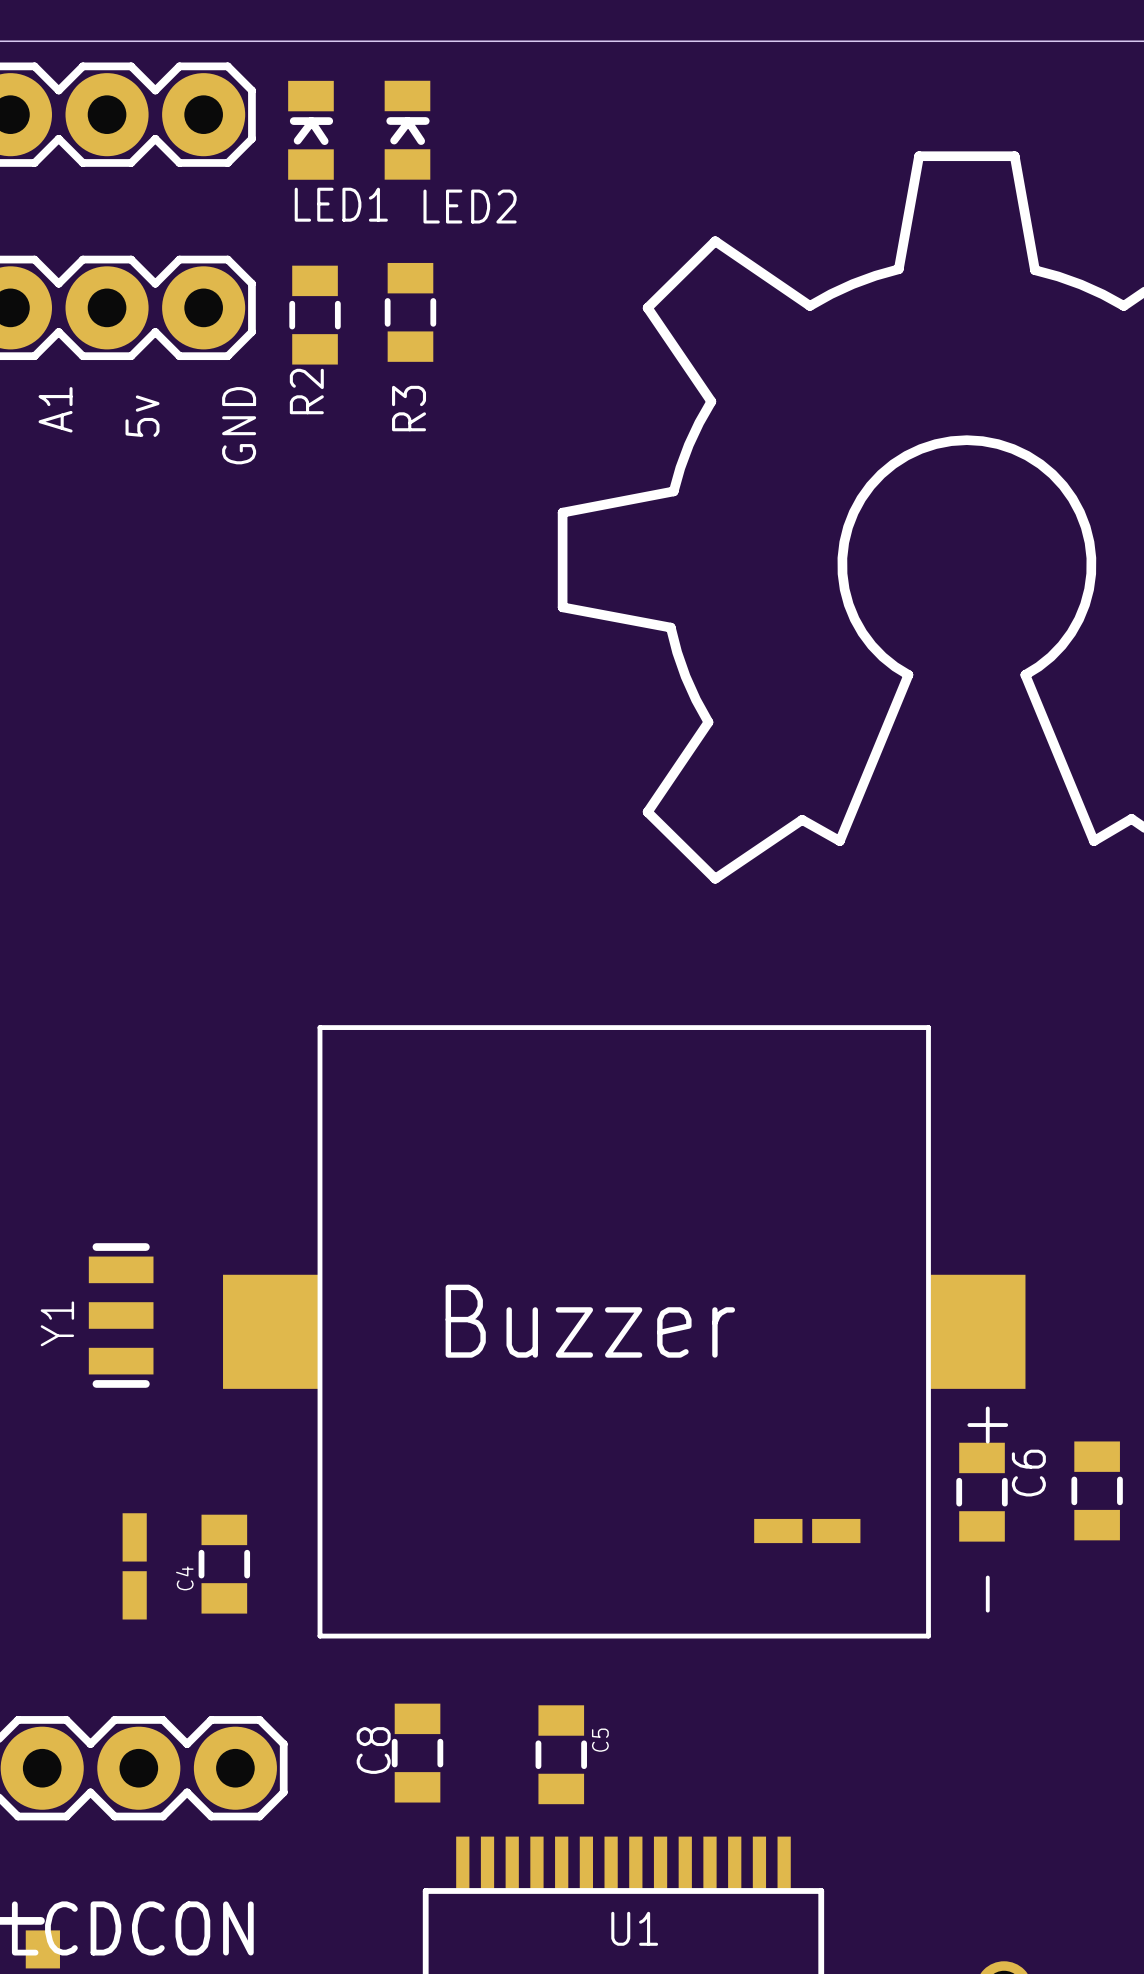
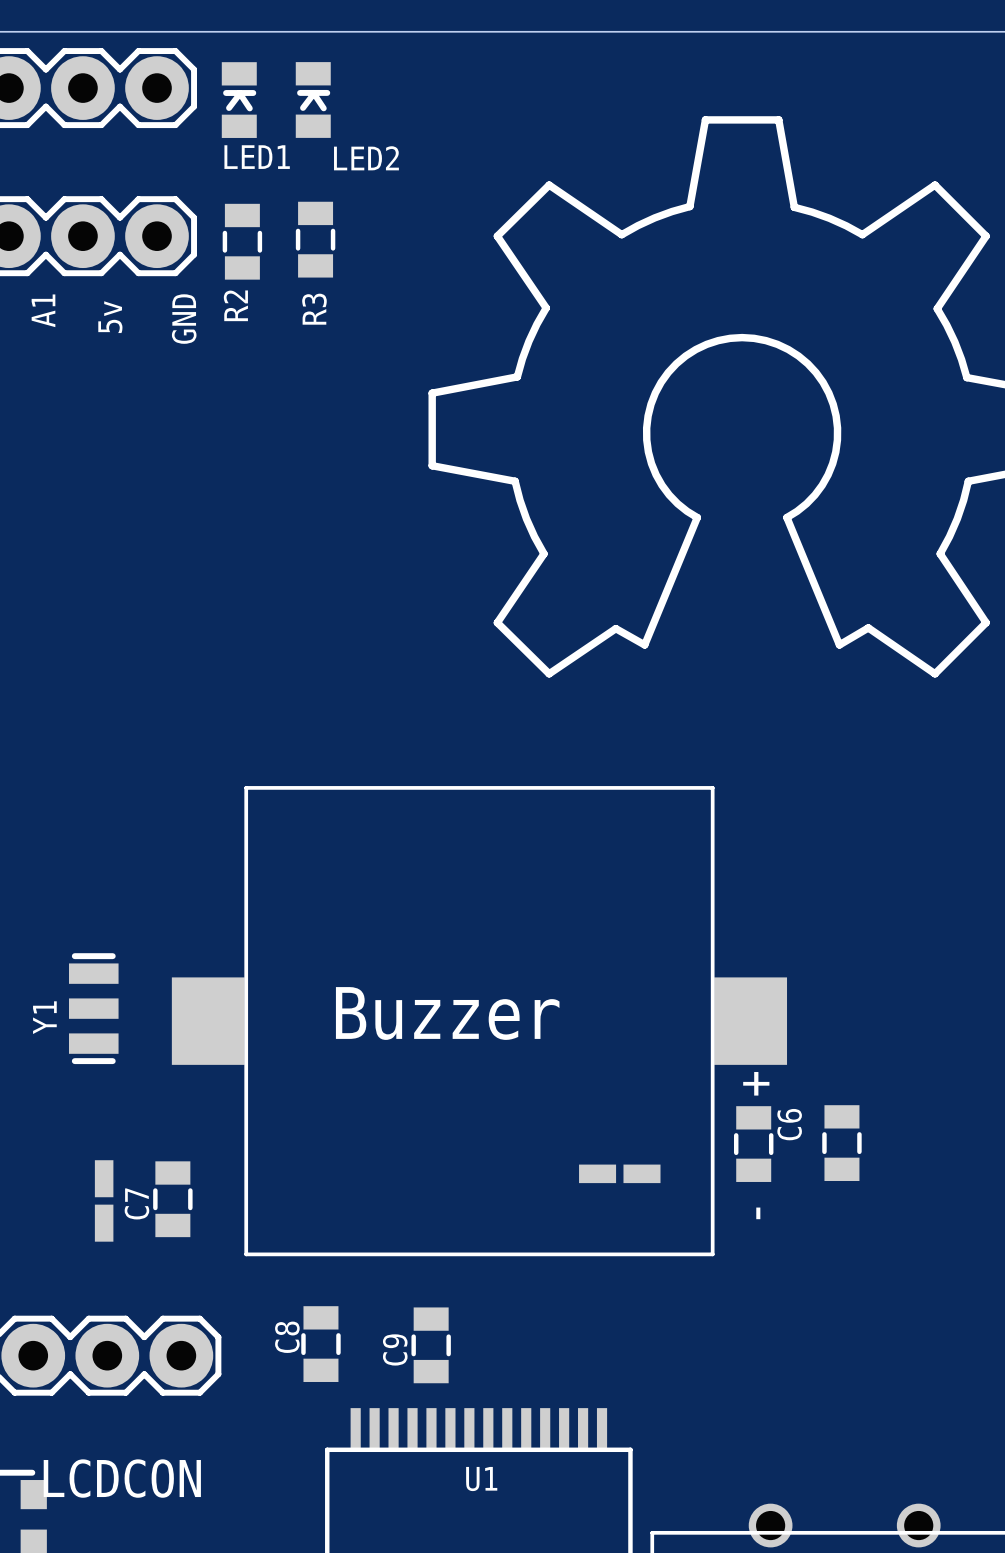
C4 name: C4 (184, 1578) -> C7 (136, 1203)
C5 name: C5 (600, 1740) -> C9 (395, 1349)

